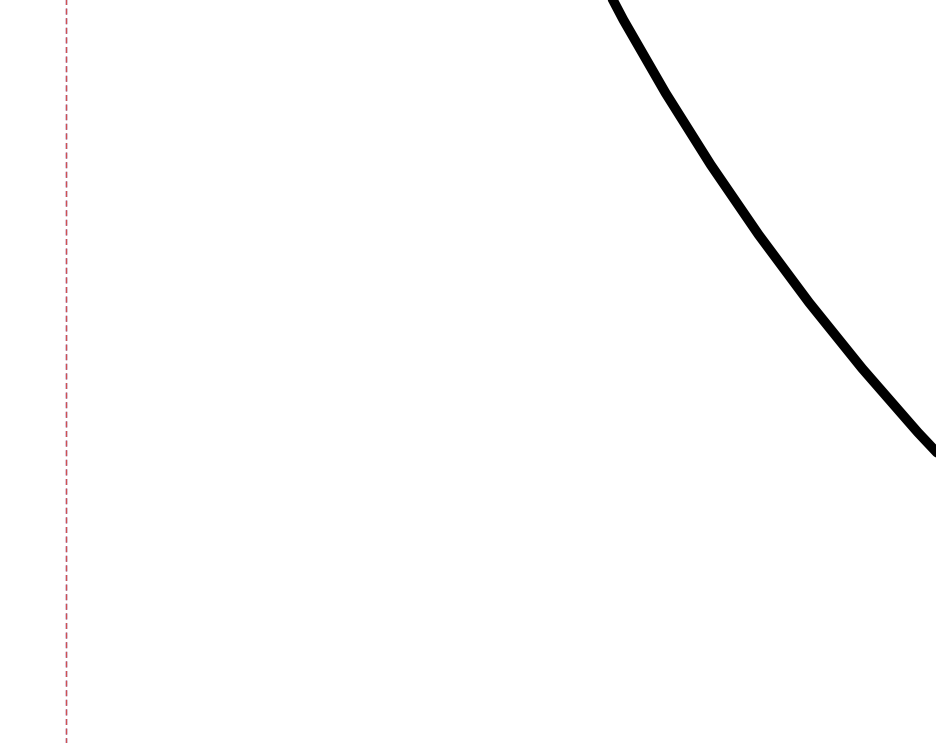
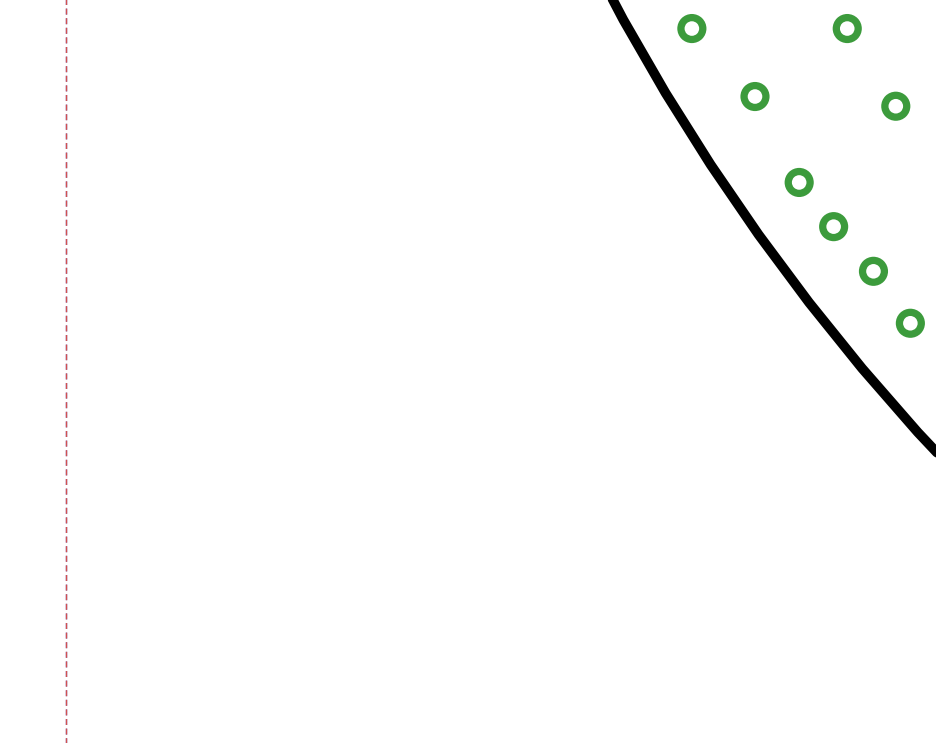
via: none -> (691, 28)
via: none -> (847, 28)
via: none -> (754, 96)
via: none -> (895, 106)
via: none -> (799, 182)
via: none -> (833, 226)
via: none -> (873, 271)
via: none -> (910, 323)

